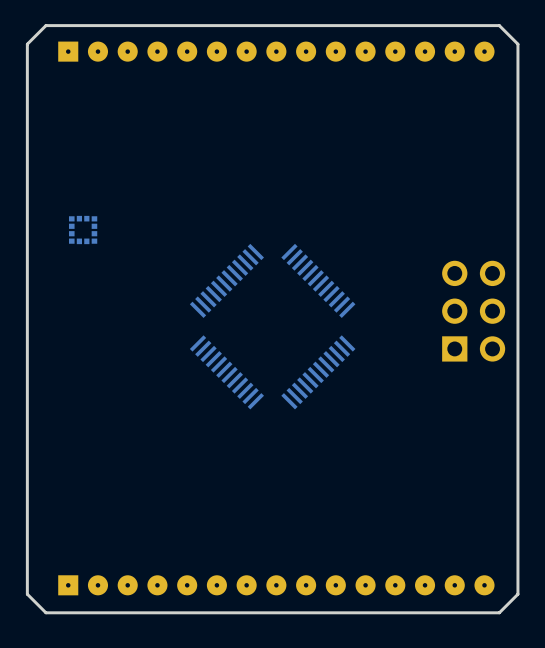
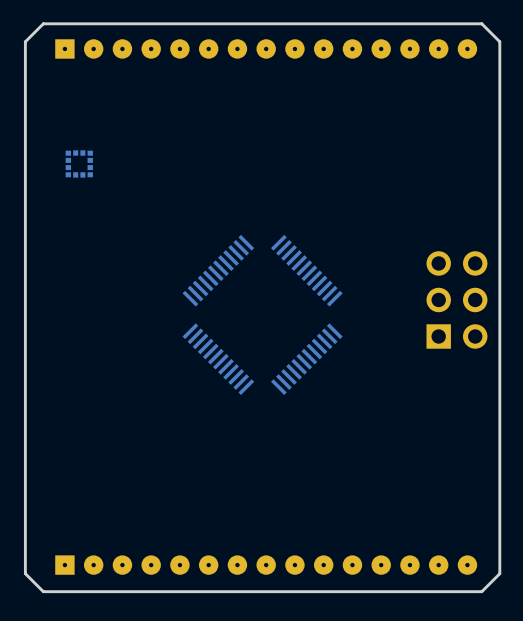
part position: (83, 230) -> (79, 163)

